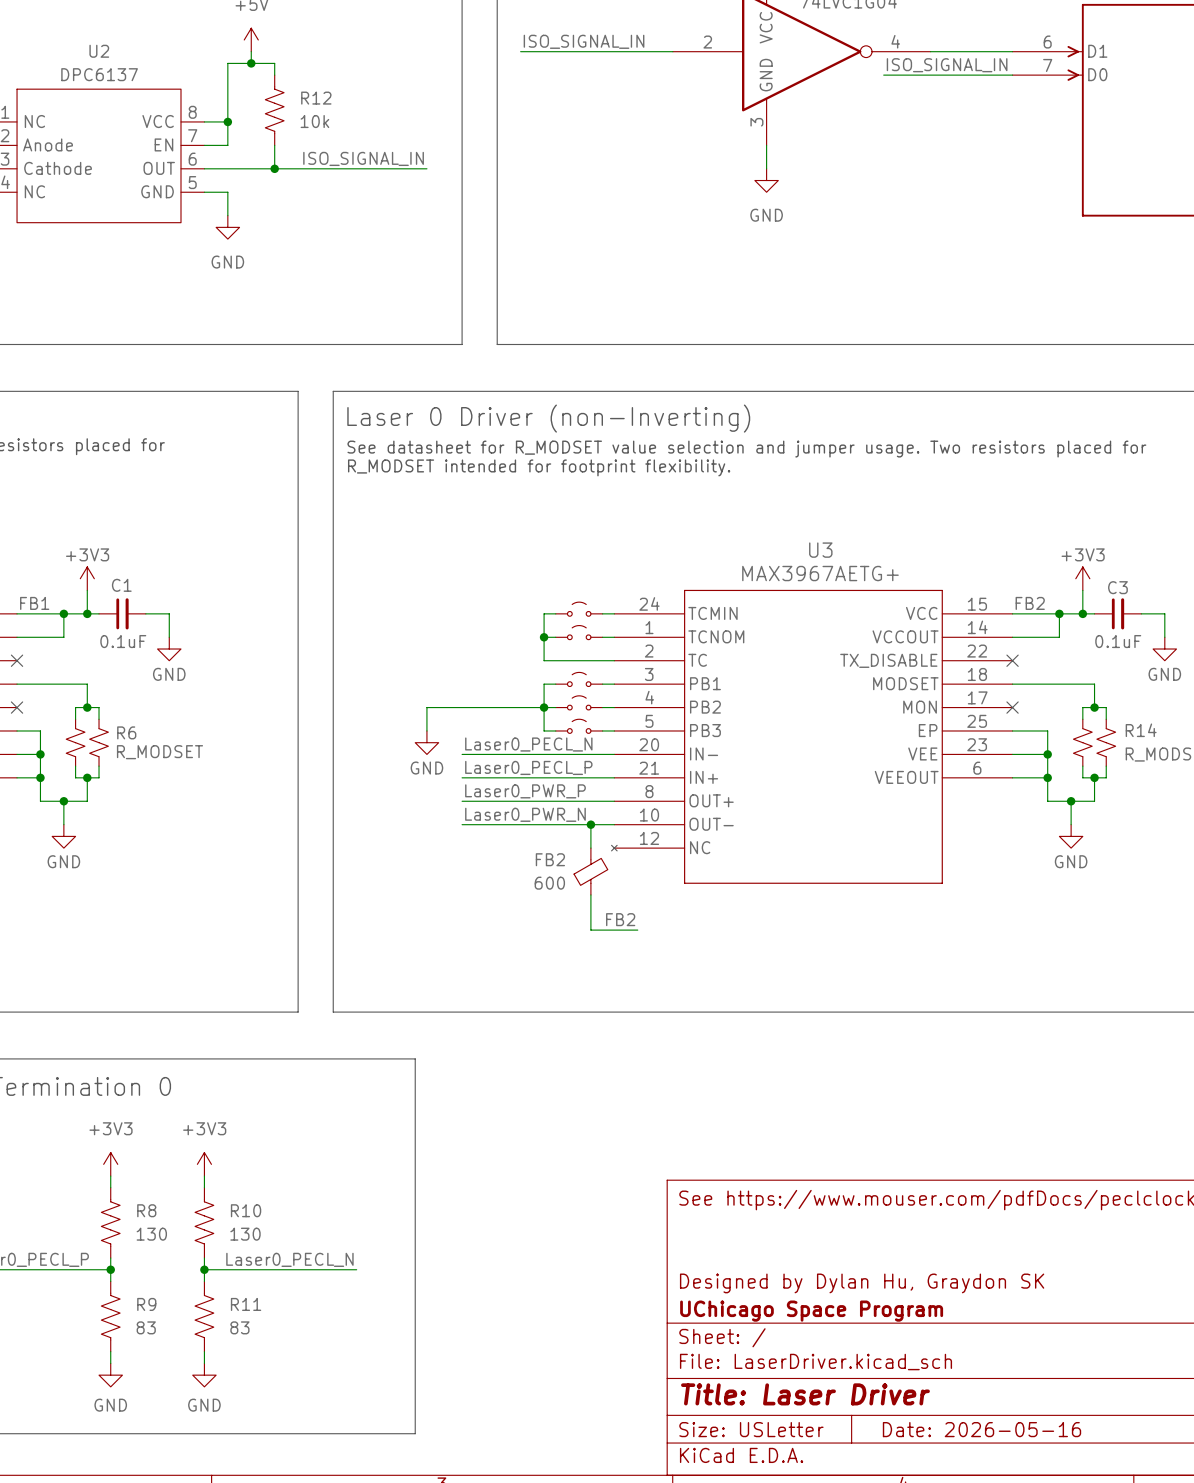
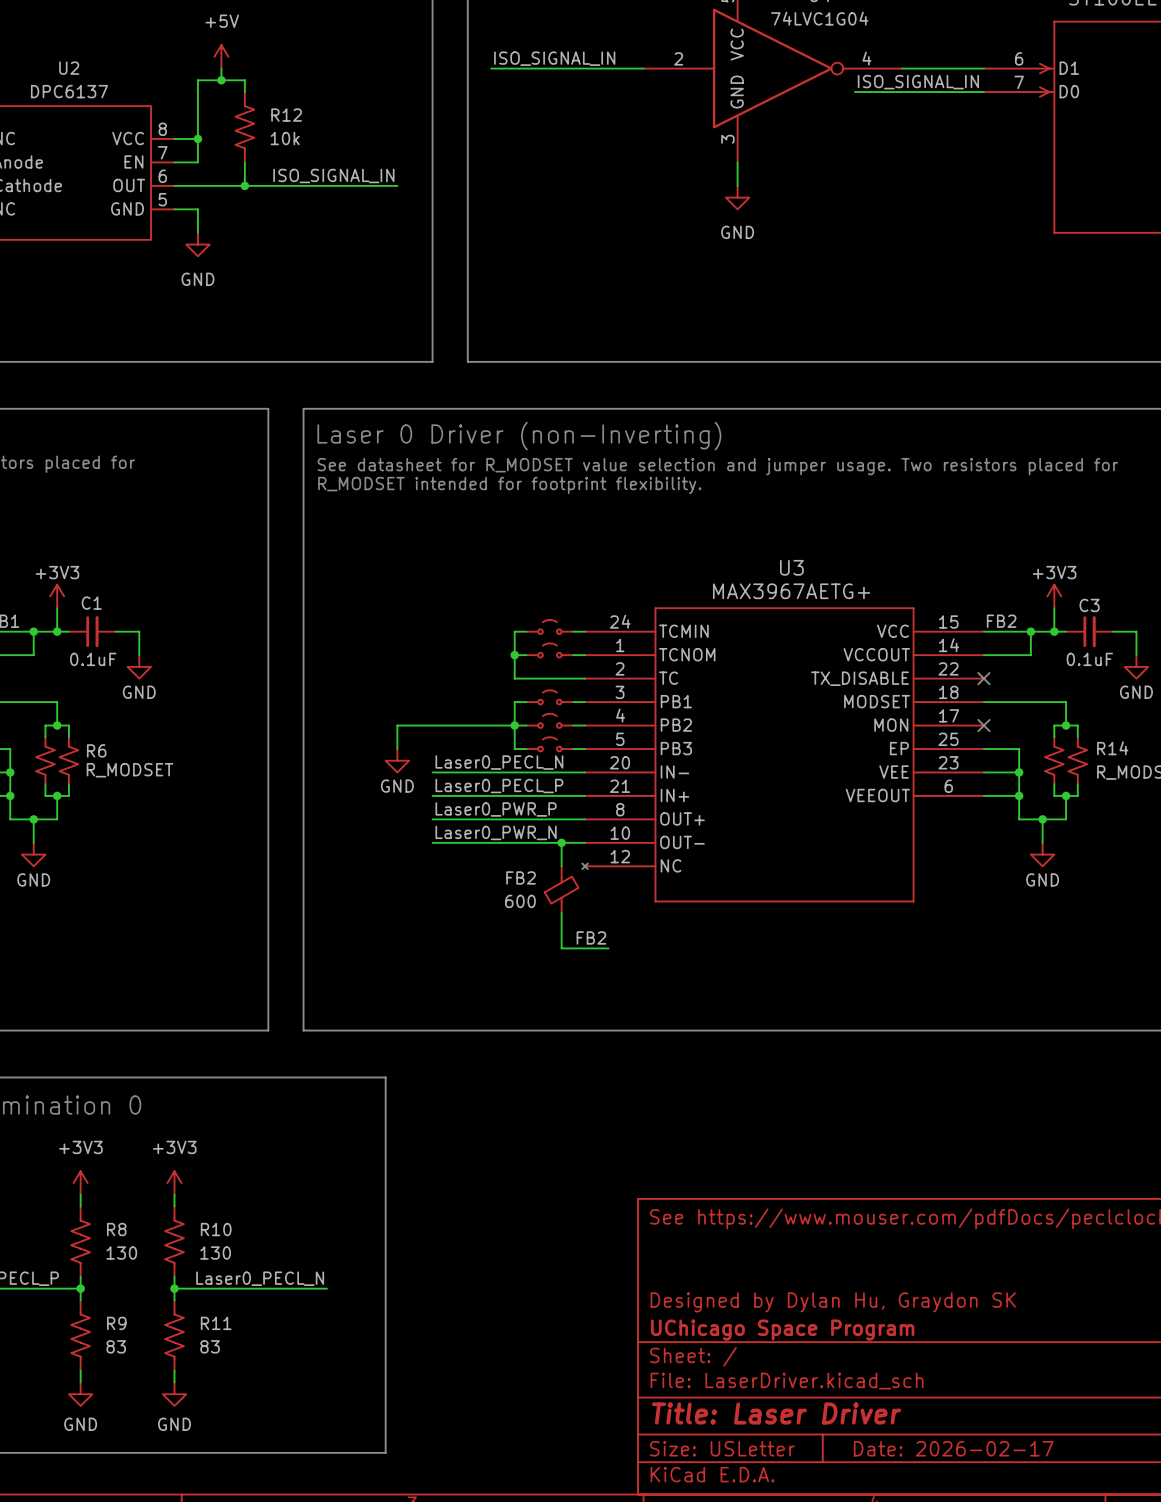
title block: Date: 2026-05-16 (981, 1429) -> Date: 2026-02-17 (953, 1448)

